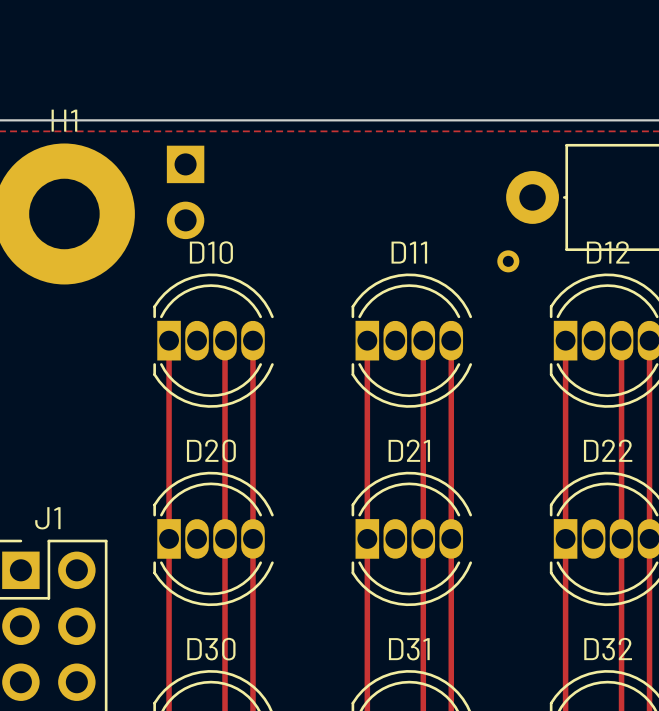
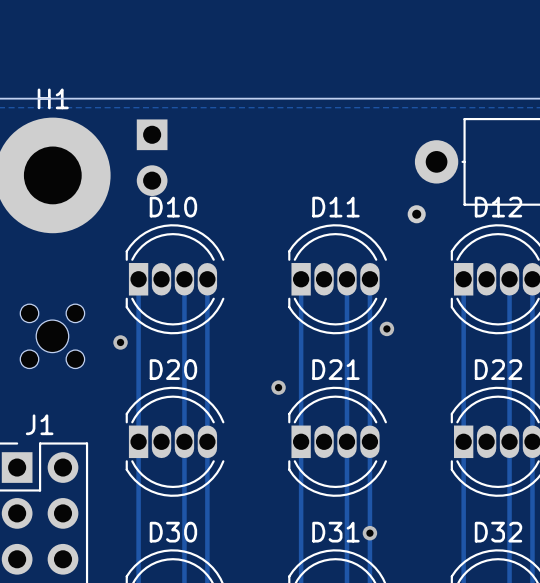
via: none -> (386, 328)
part: none -> (52, 336)
via: none -> (120, 342)
via: none -> (278, 387)
via: none -> (369, 533)

